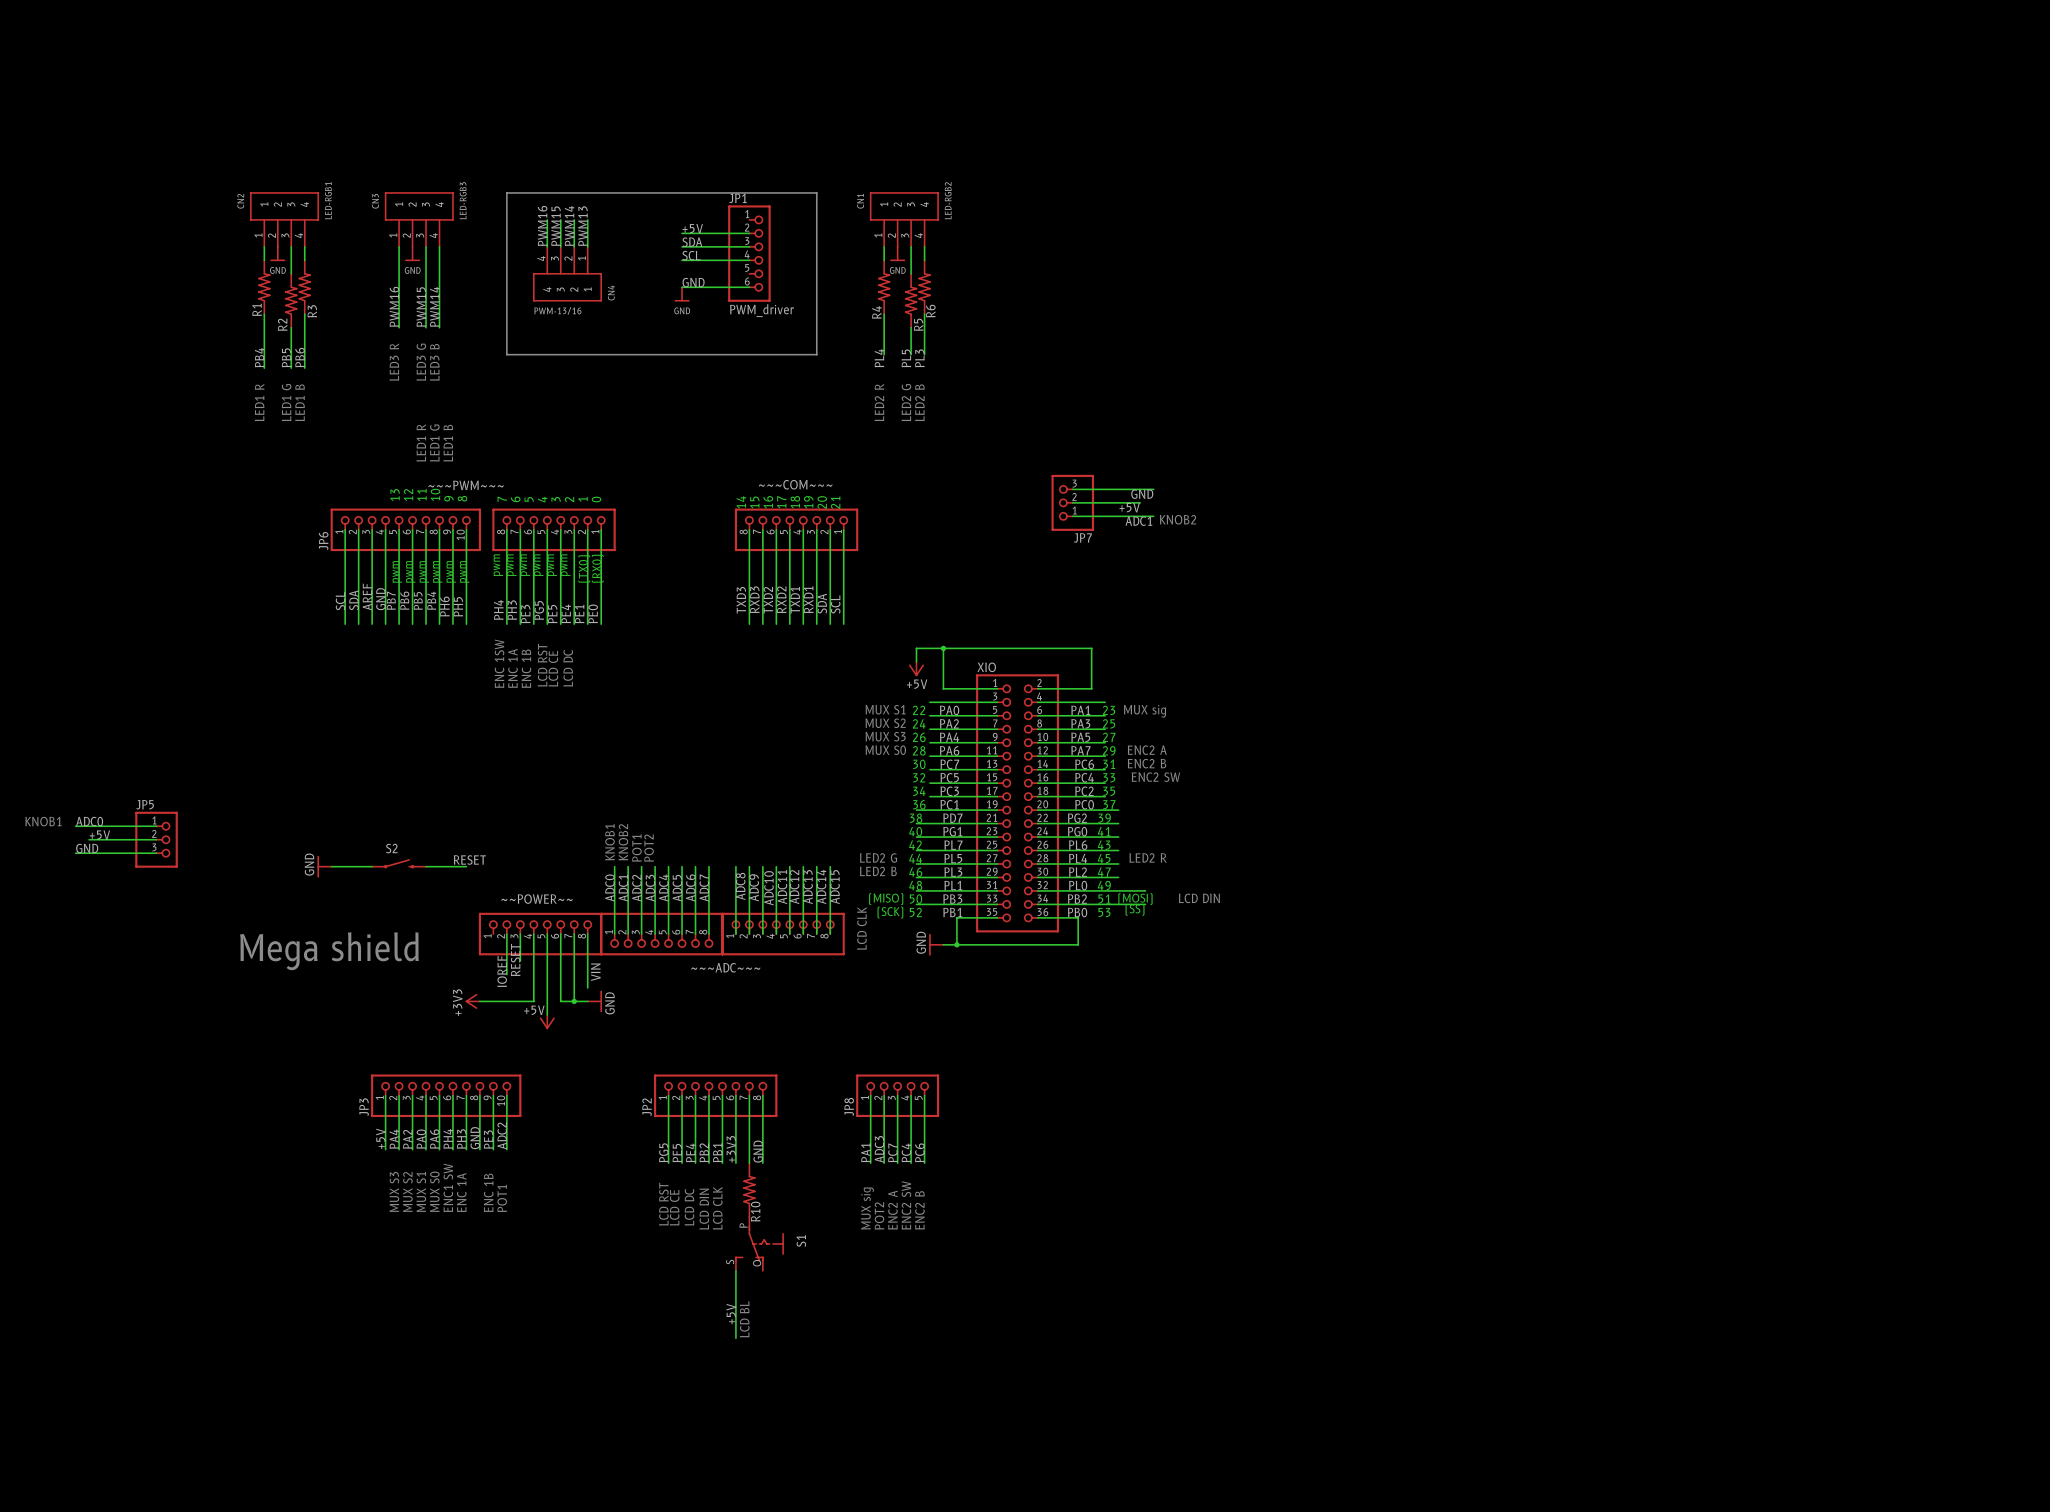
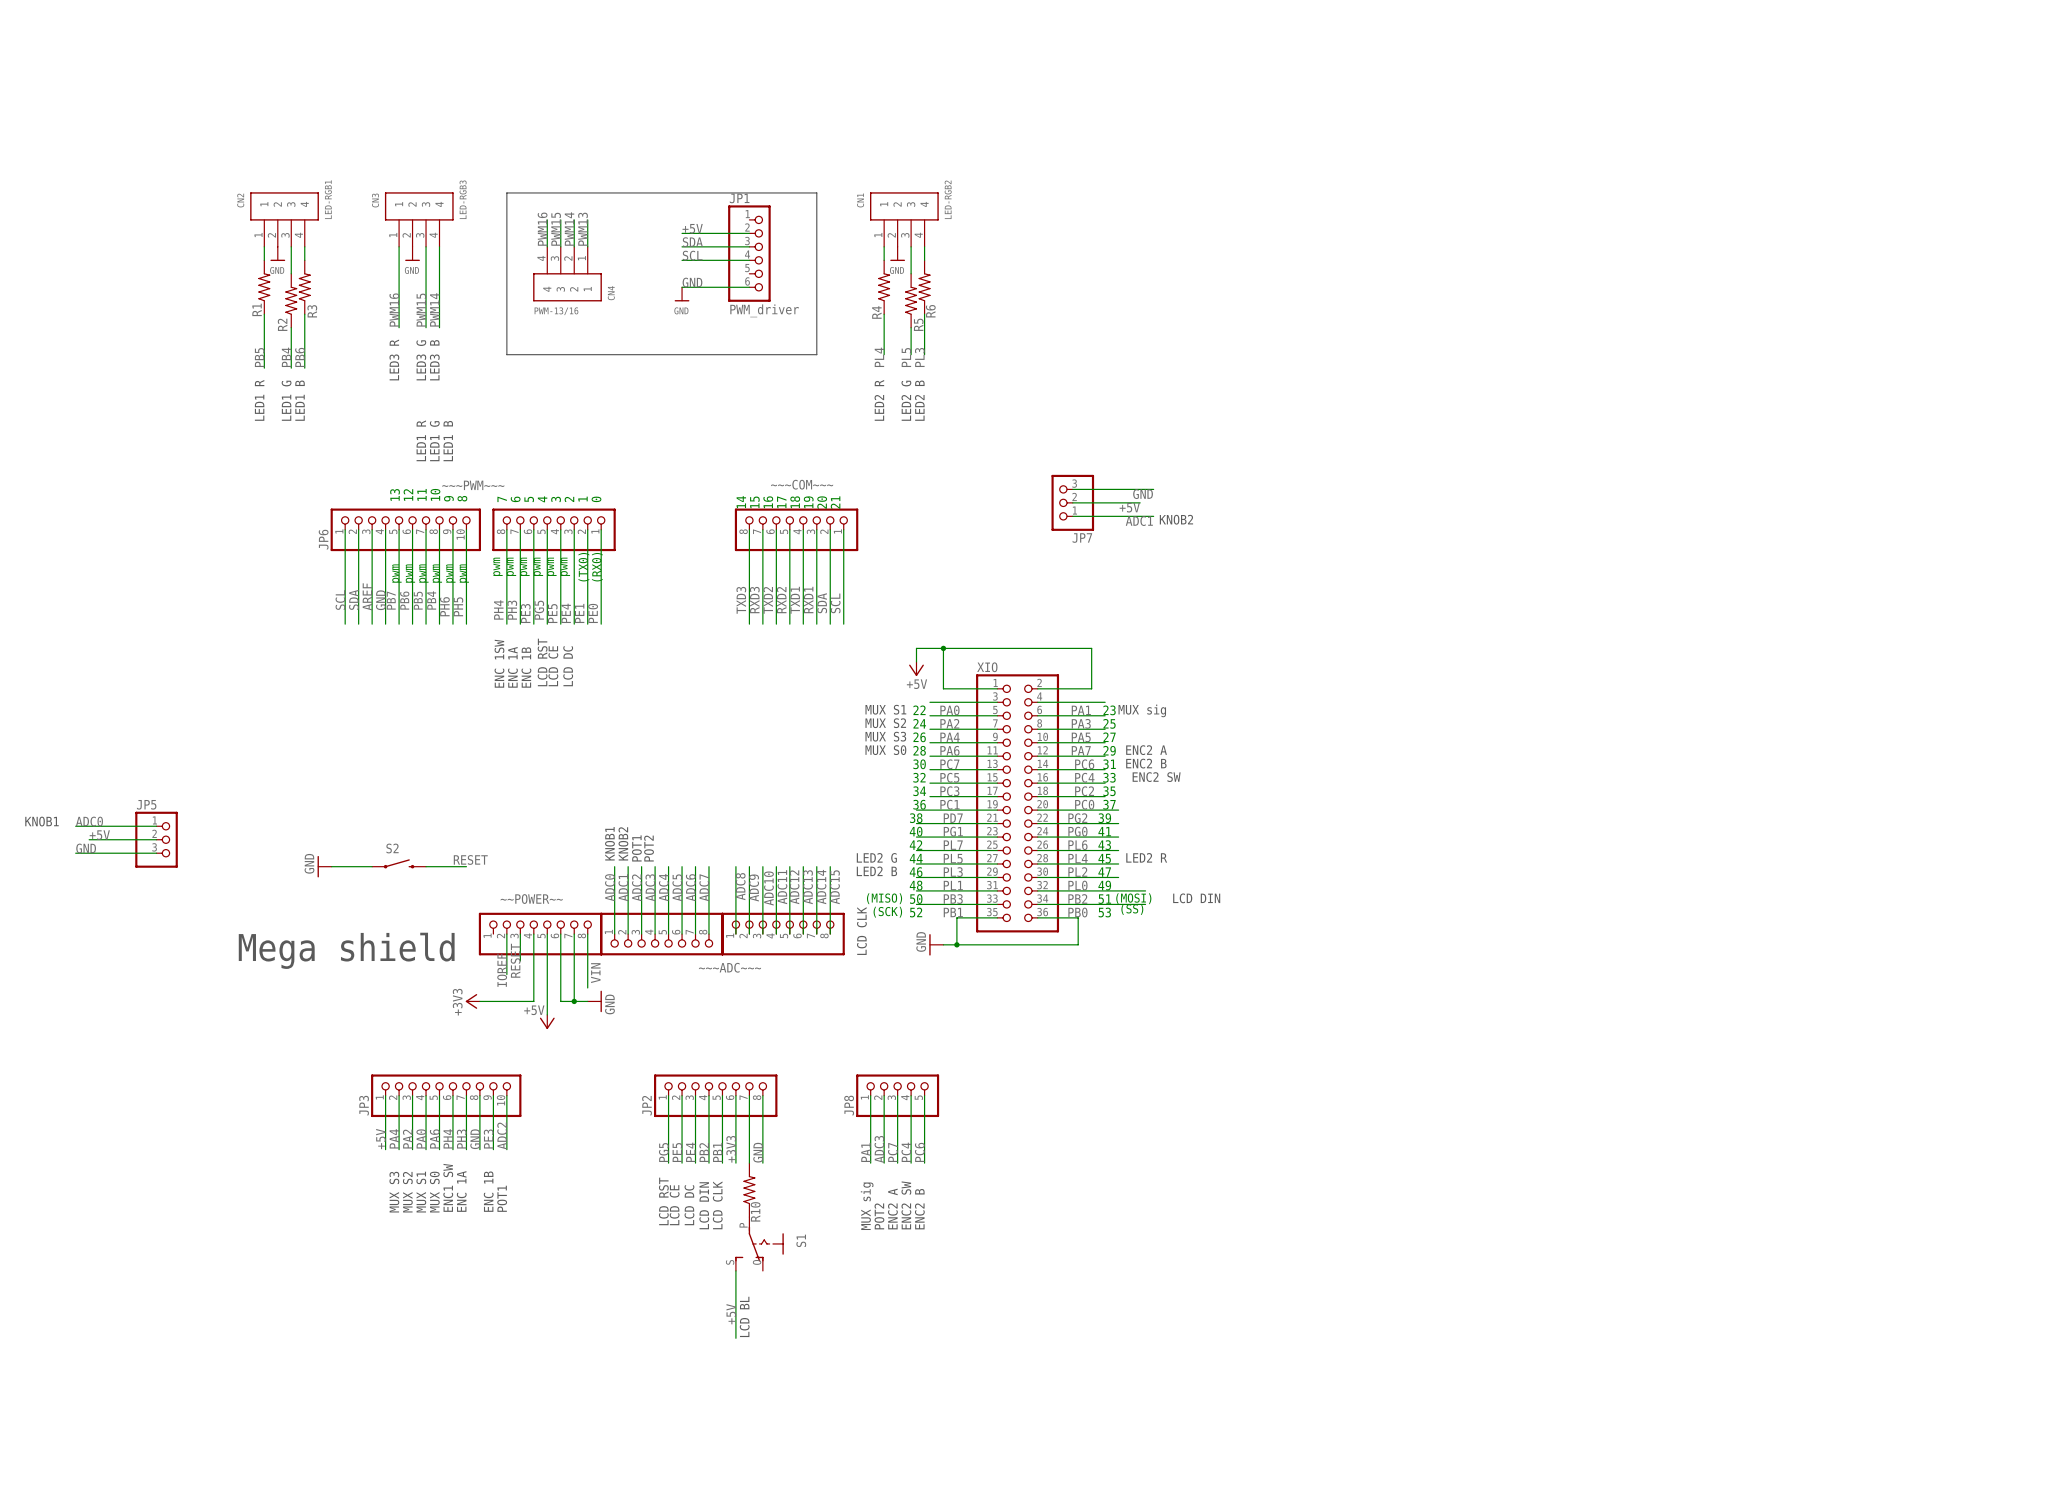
label: PB4 (259, 357) -> PB5 (259, 357)
label: PB5 (286, 357) -> PB4 (286, 357)

